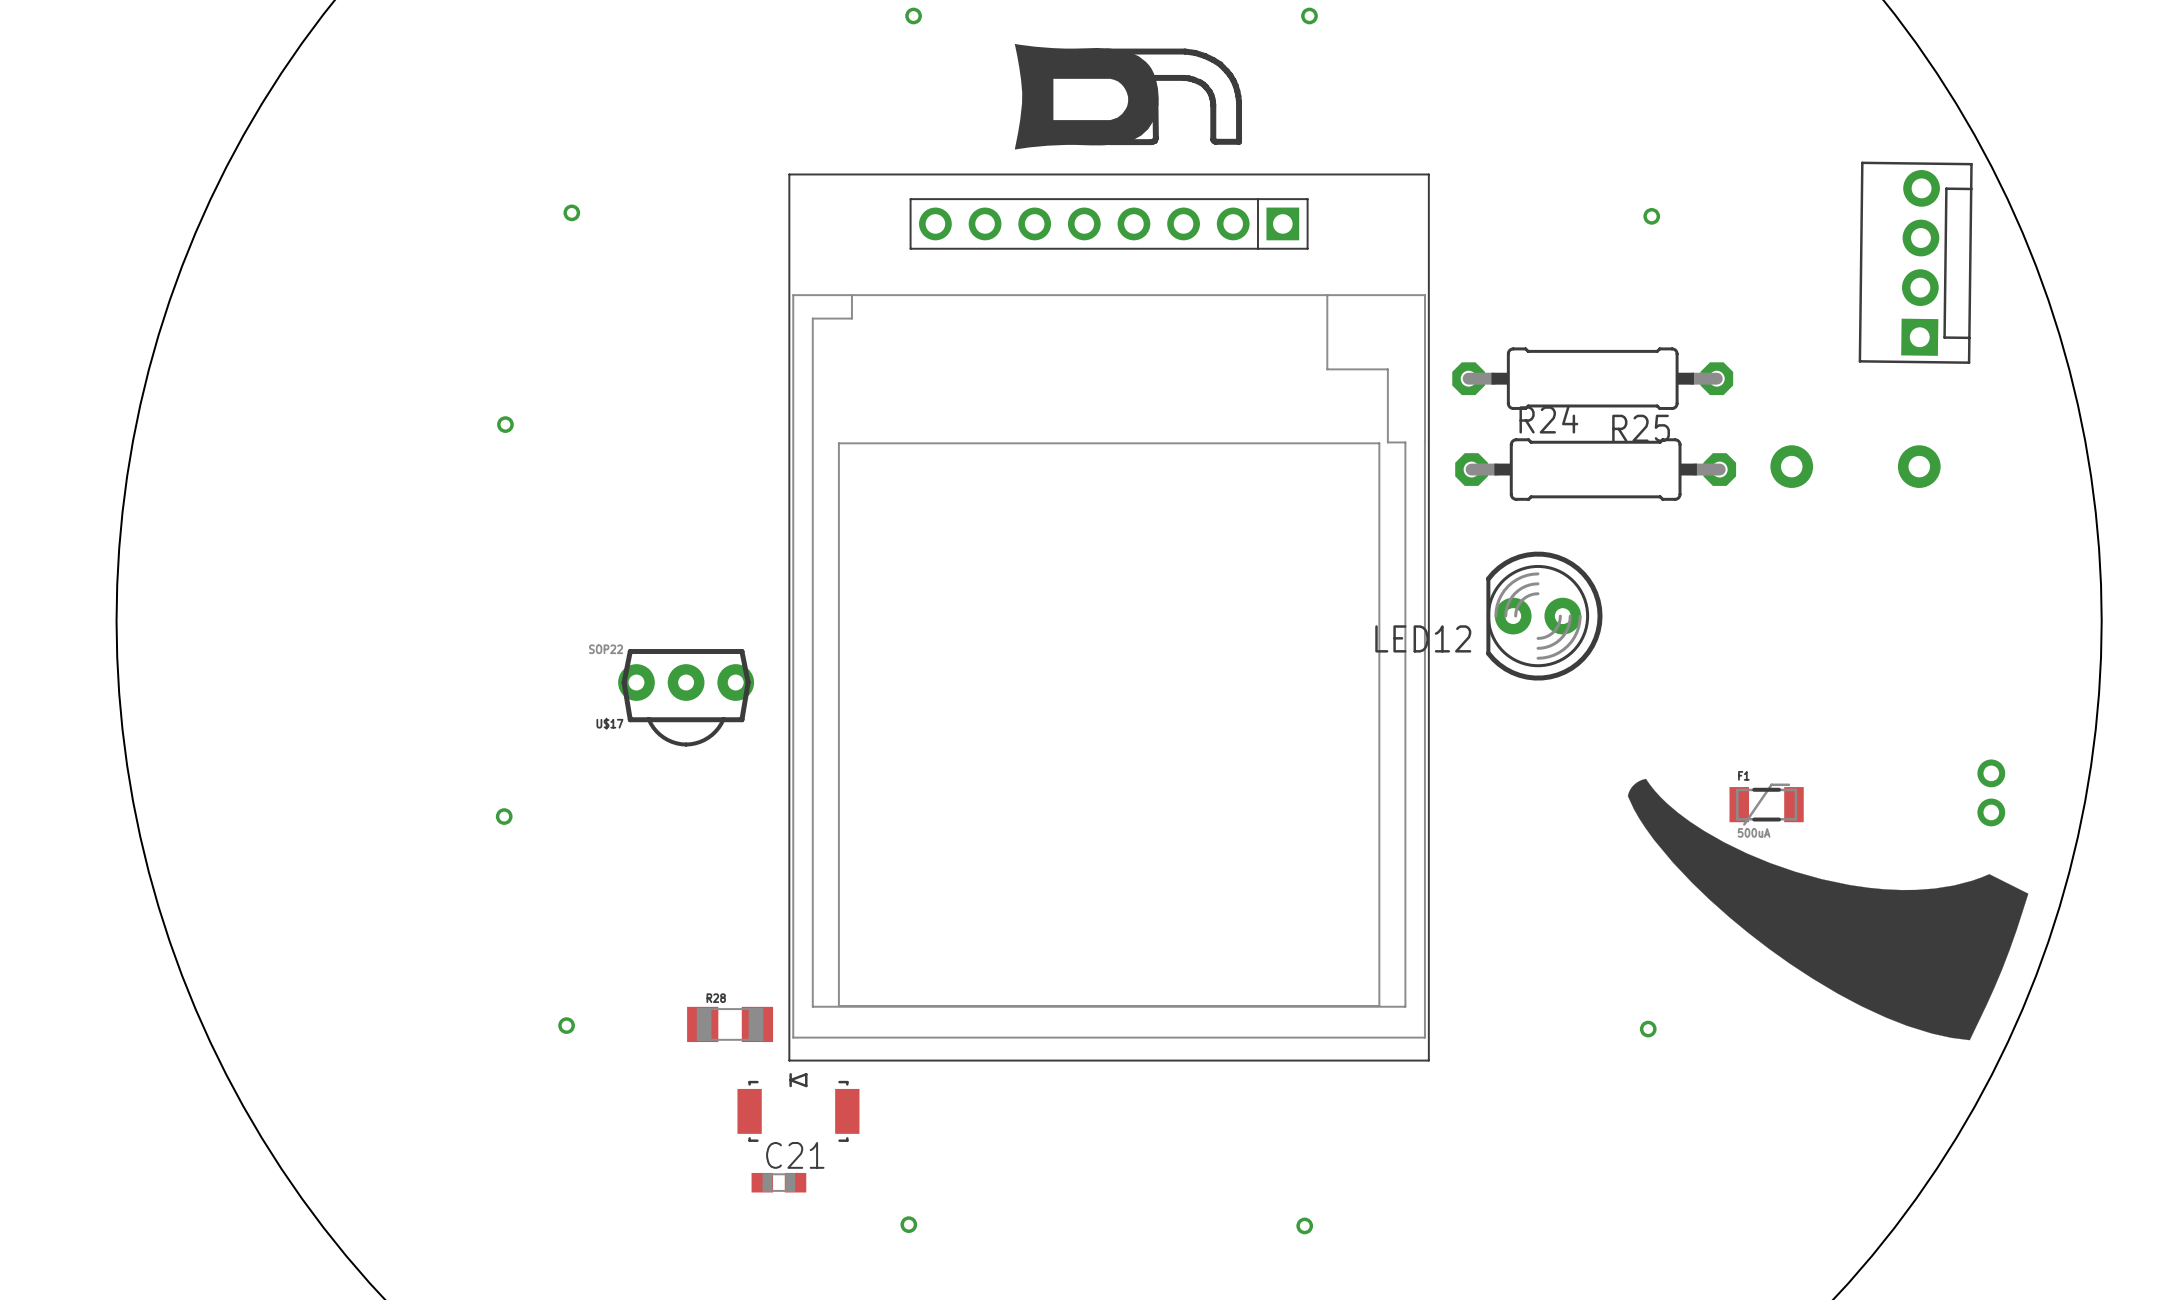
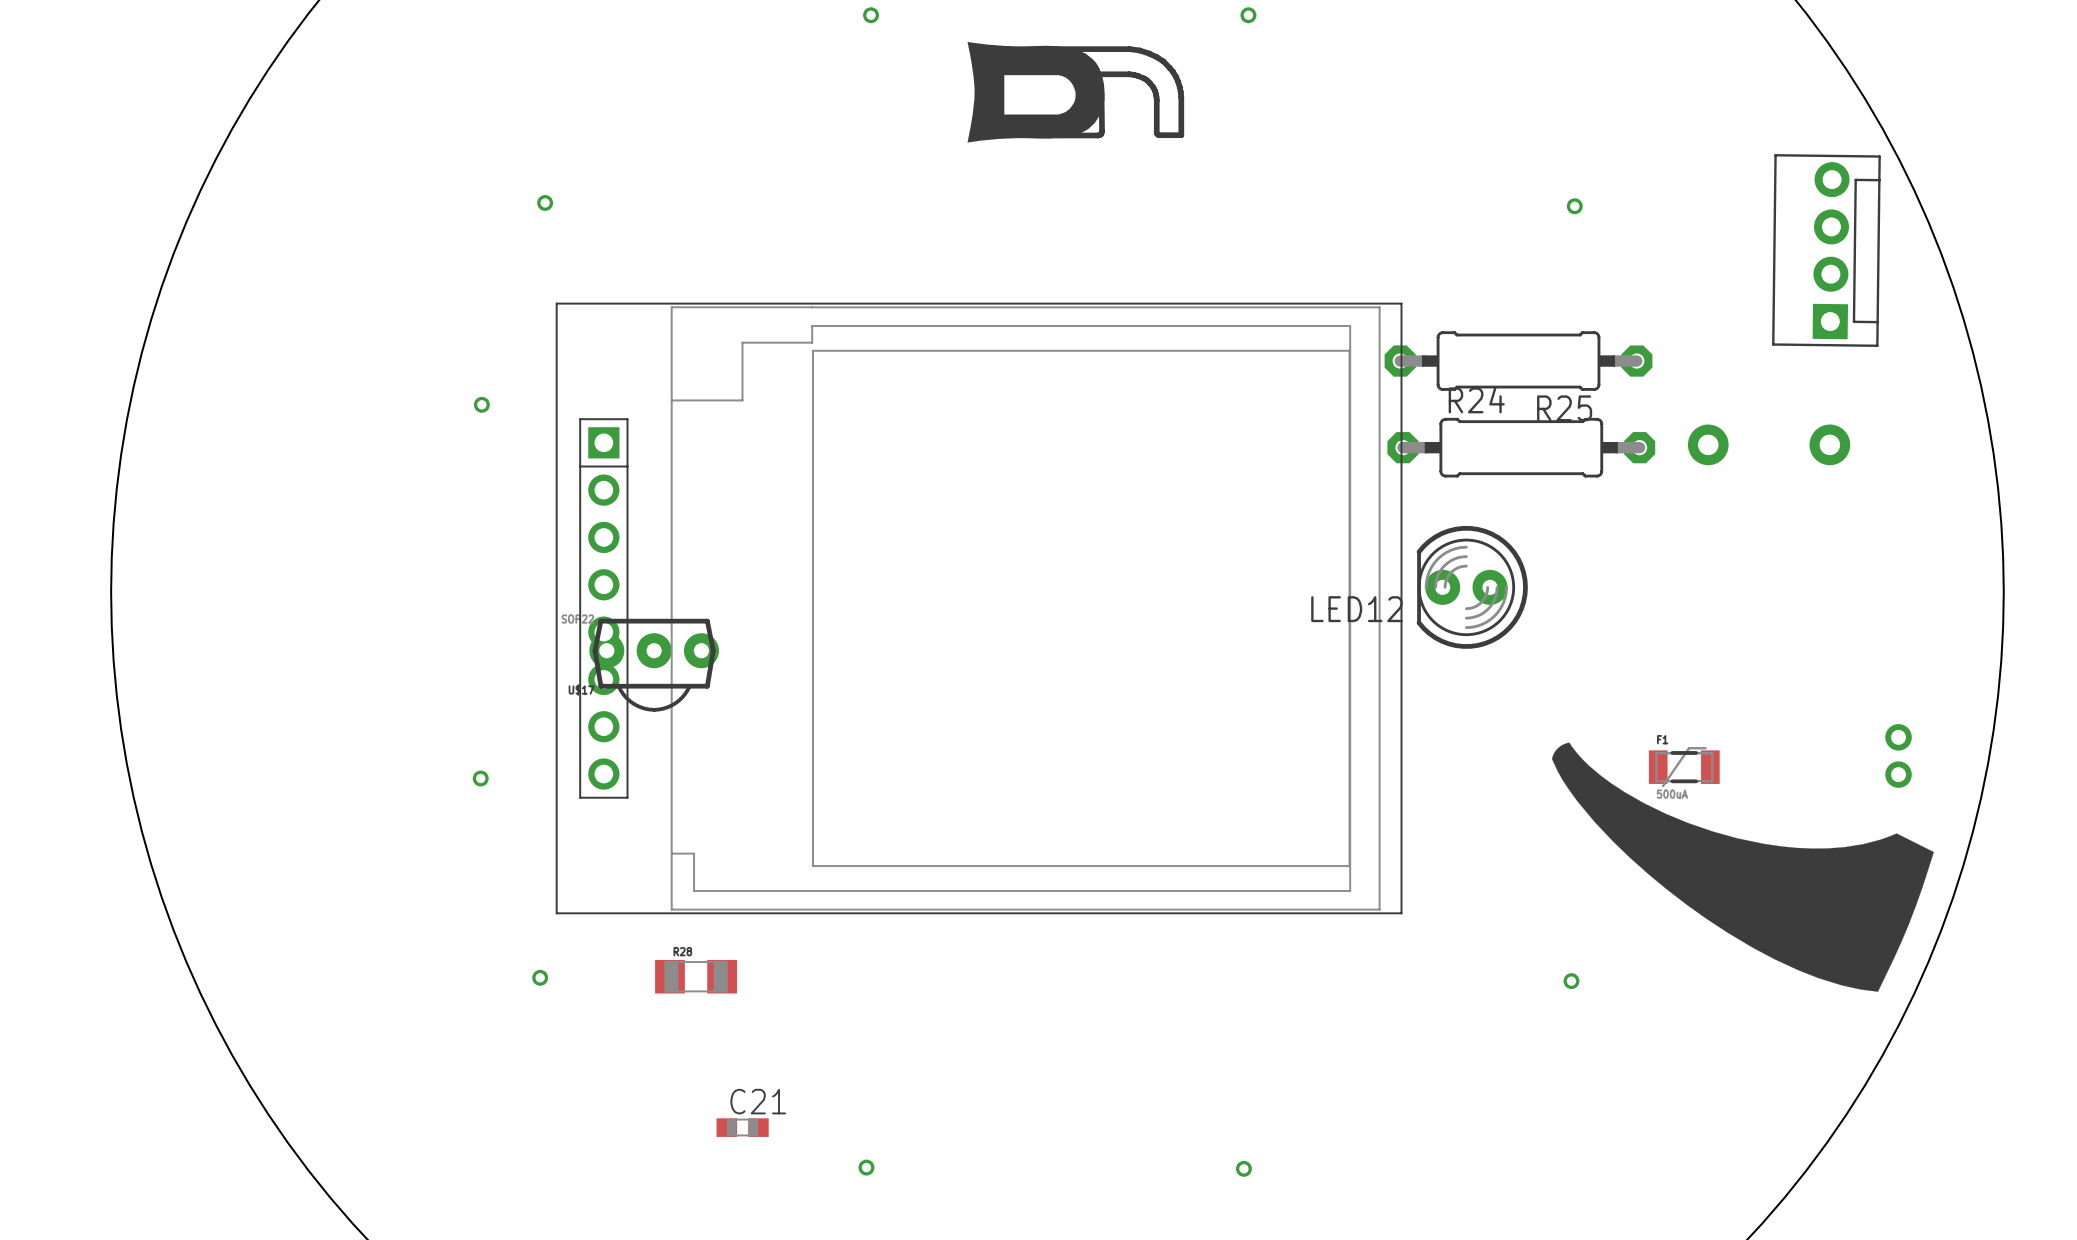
part rotation: 0° (1109, 617) -> 90° counterclockwise (979, 608)
part: (798, 1107) -> none

